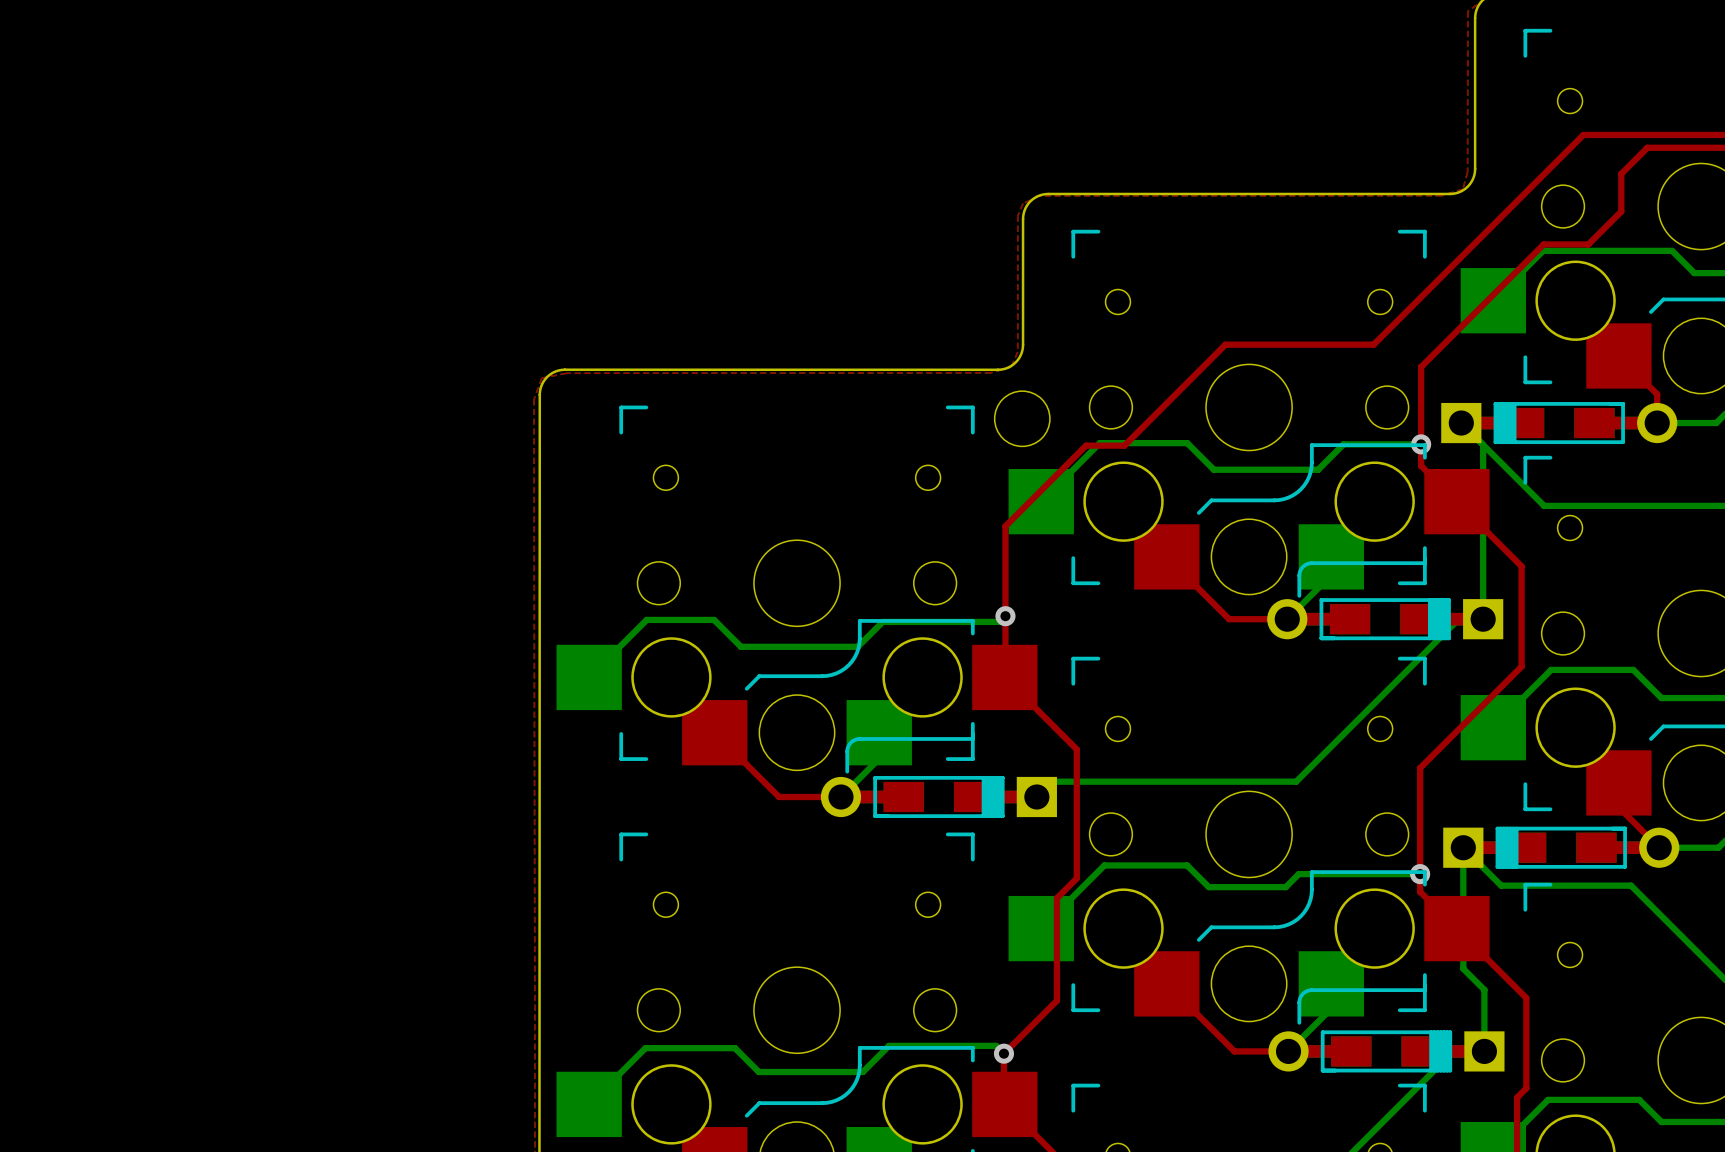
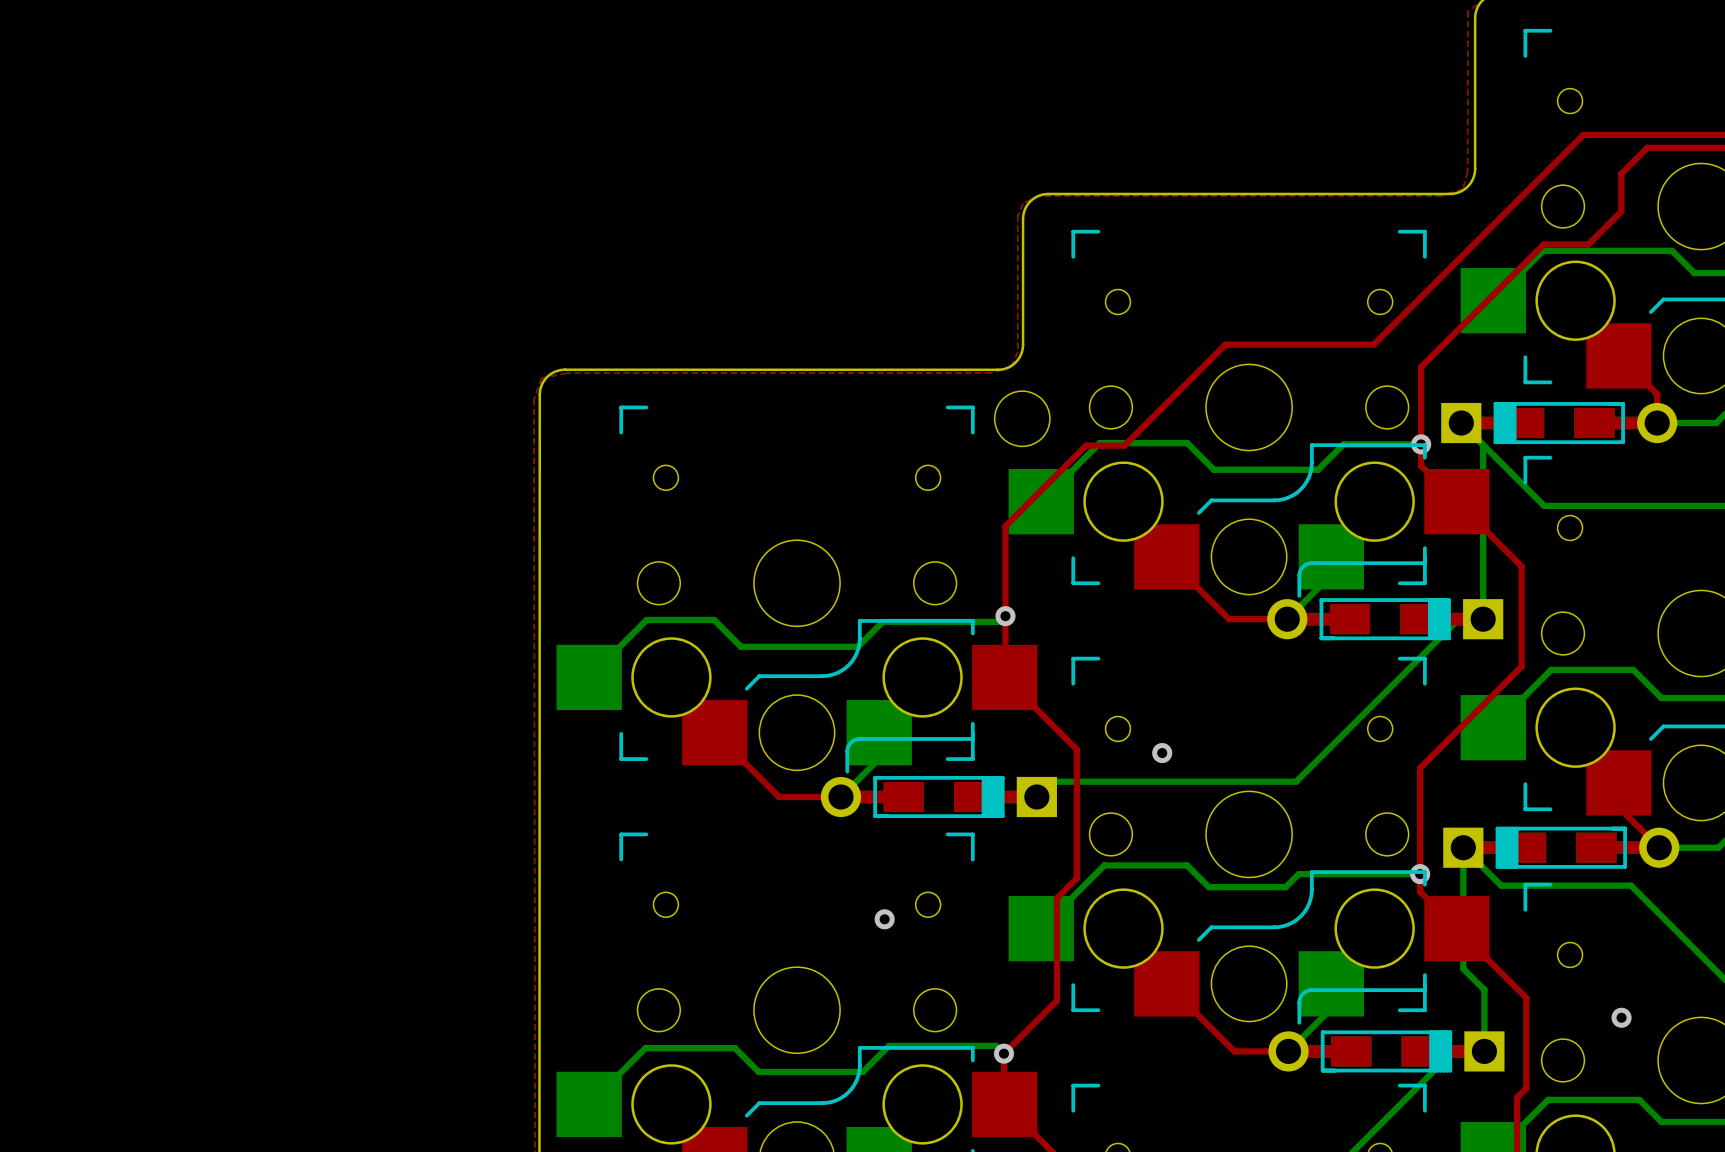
via: none -> (1162, 753)
via: none -> (884, 919)
via: none -> (1621, 1017)

